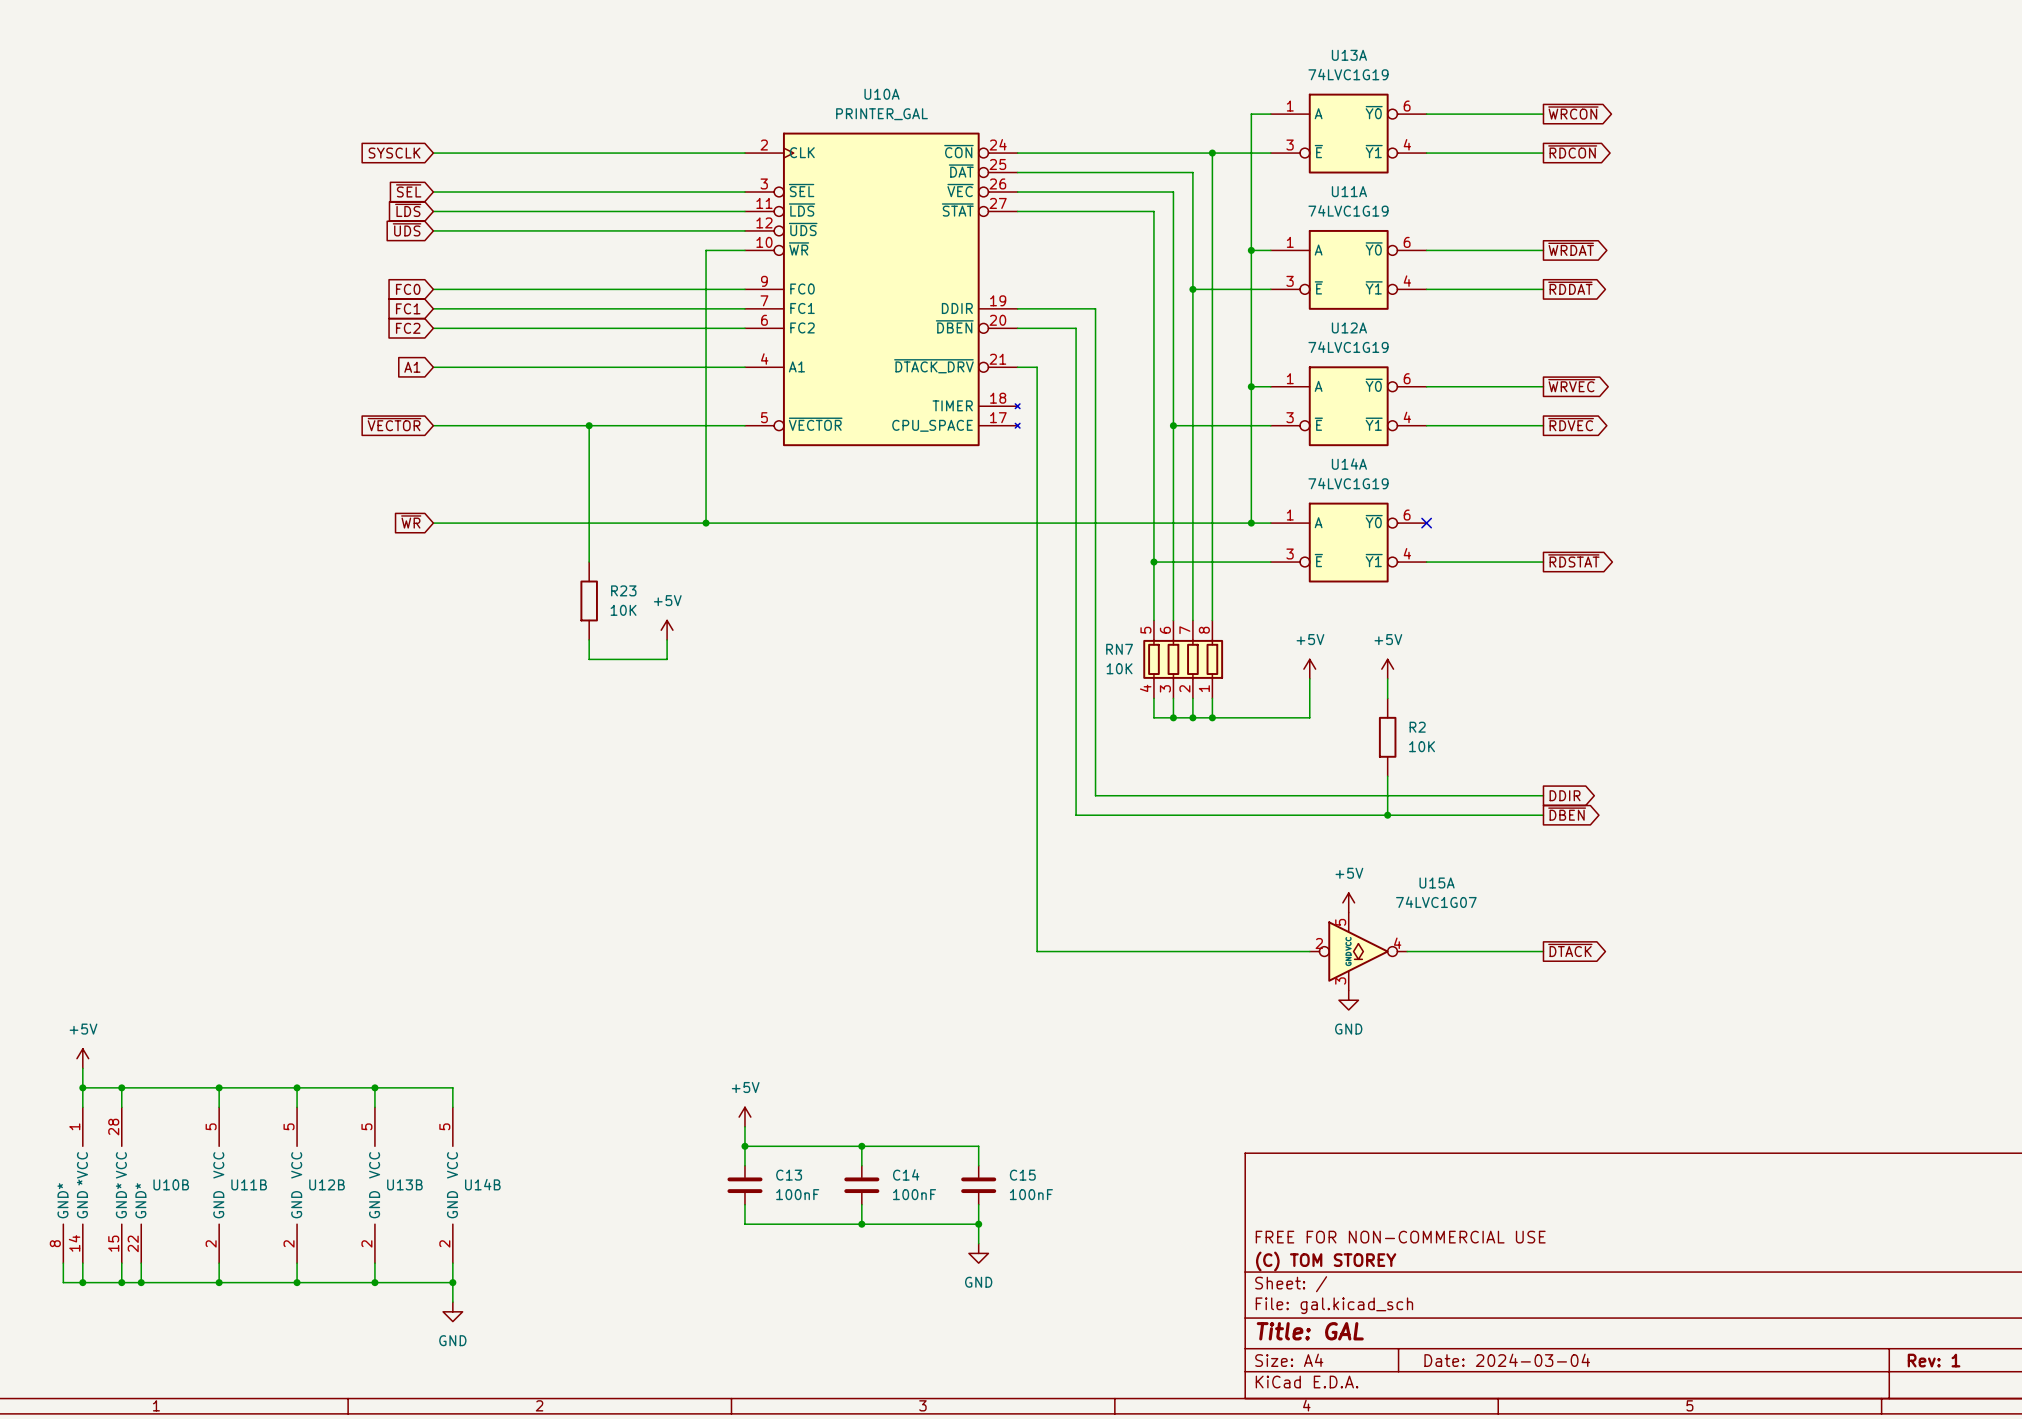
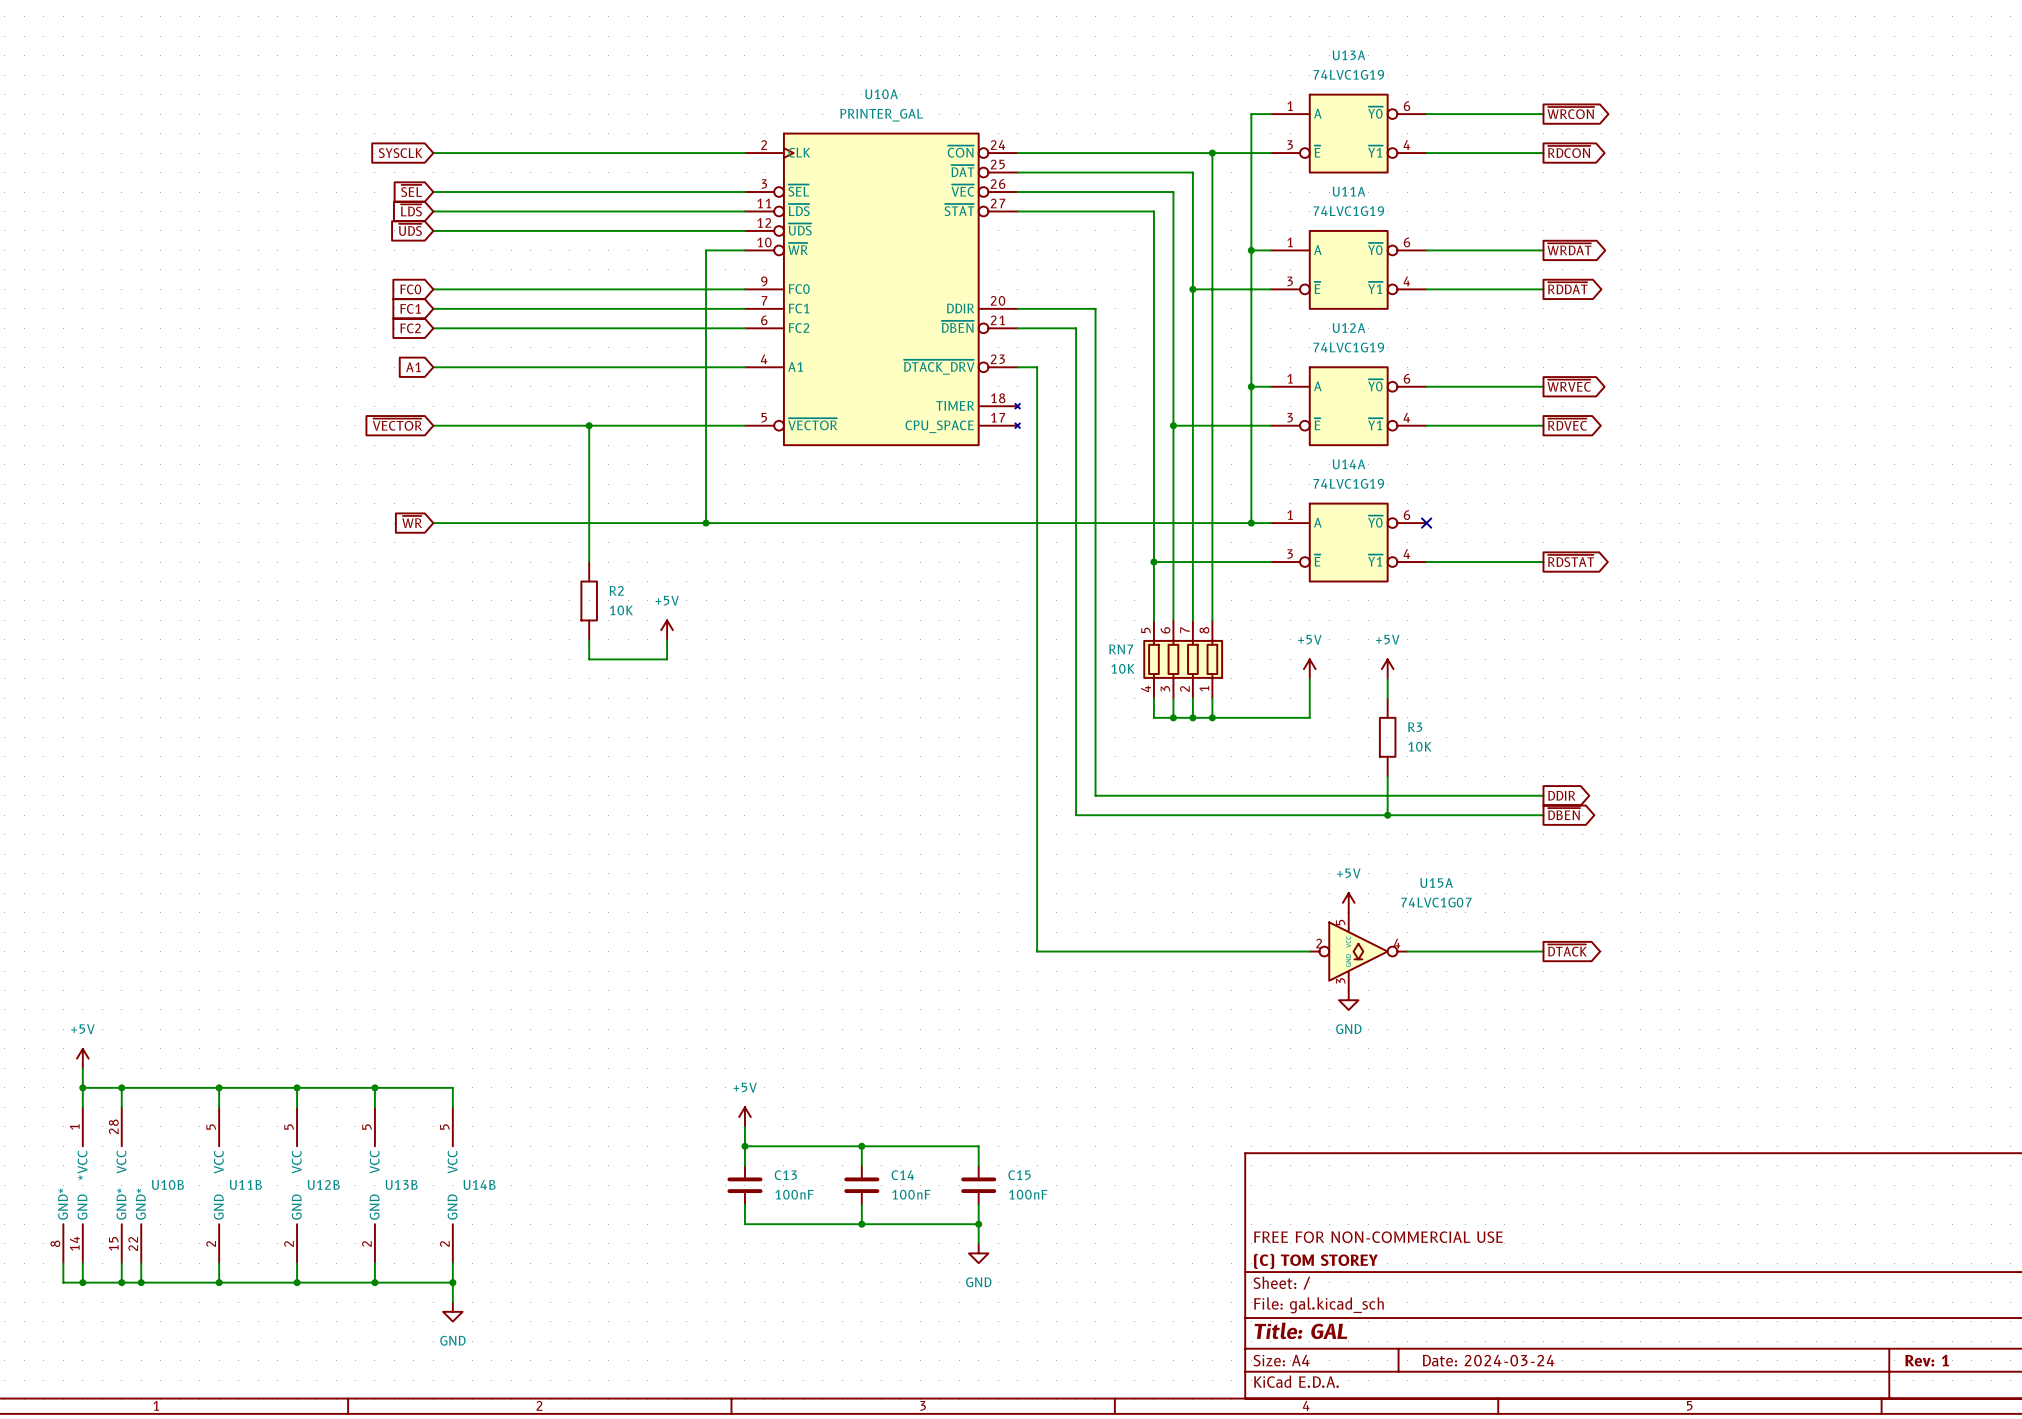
U10A pin number: 19 (998, 300) -> 20 (998, 300)
U10A pin number: 20 (997, 320) -> 21 (997, 320)
U10A pin number: 21 (997, 359) -> 23 (997, 359)
R23 name: R23 (623, 590) -> R2 (616, 590)
R2 name: R2 (1417, 727) -> R3 (1415, 727)
title block: Date: 2024-03-04 (1507, 1360) -> Date: 2024-03-24 (1488, 1360)

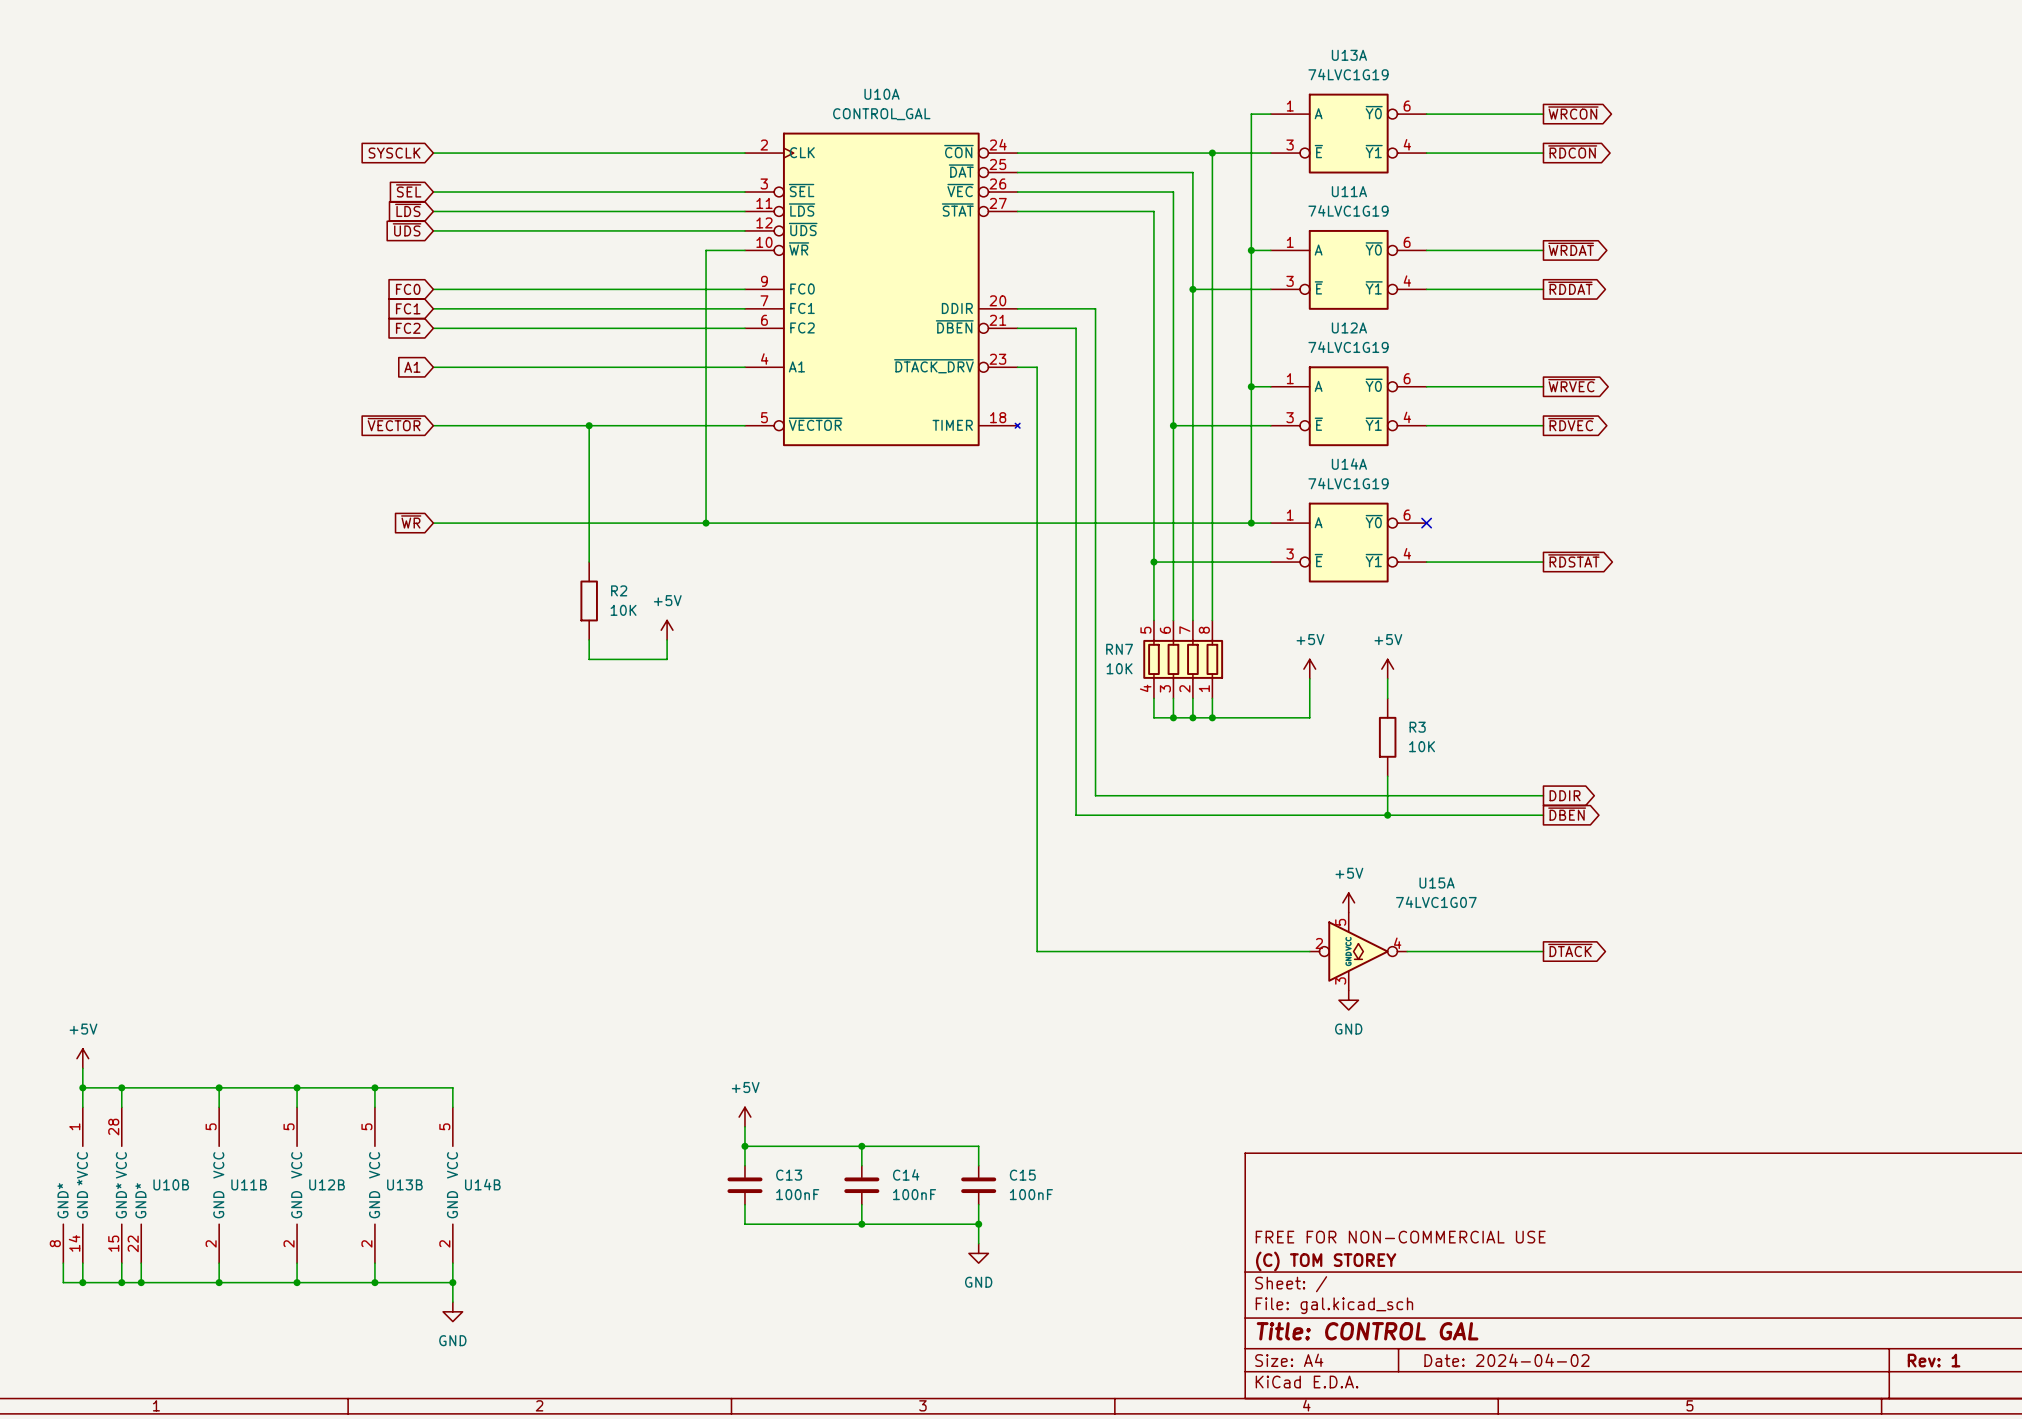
U10A value: PRINTER_GAL (881, 115) -> CONTROL_GAL (881, 114)
U10A symbol: [744, 132, 1020, 447] -> [744, 132, 1020, 447]
title block: Title: GAL (1301, 1330) -> Title: CONTROL GAL (1367, 1331)
title block: Date: 2024-03-24 (1488, 1360) -> Date: 2024-04-02 (1506, 1360)

